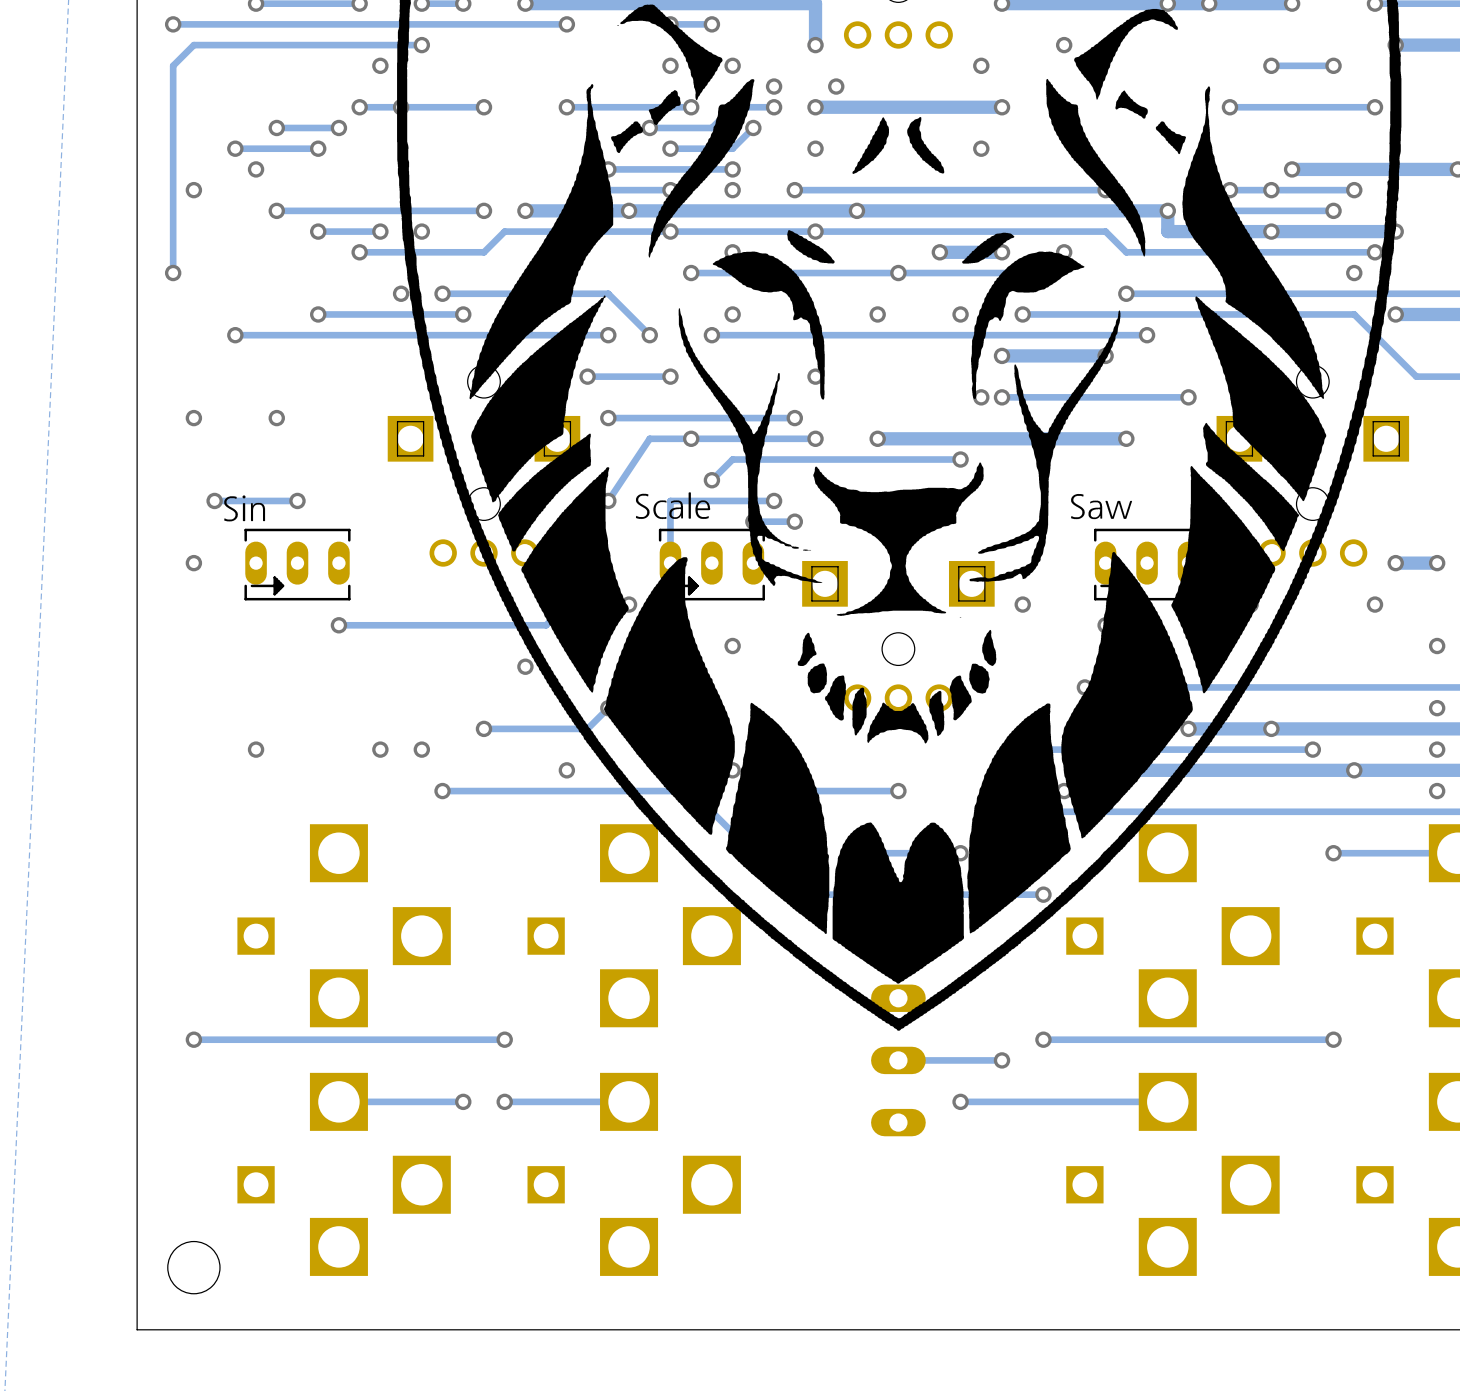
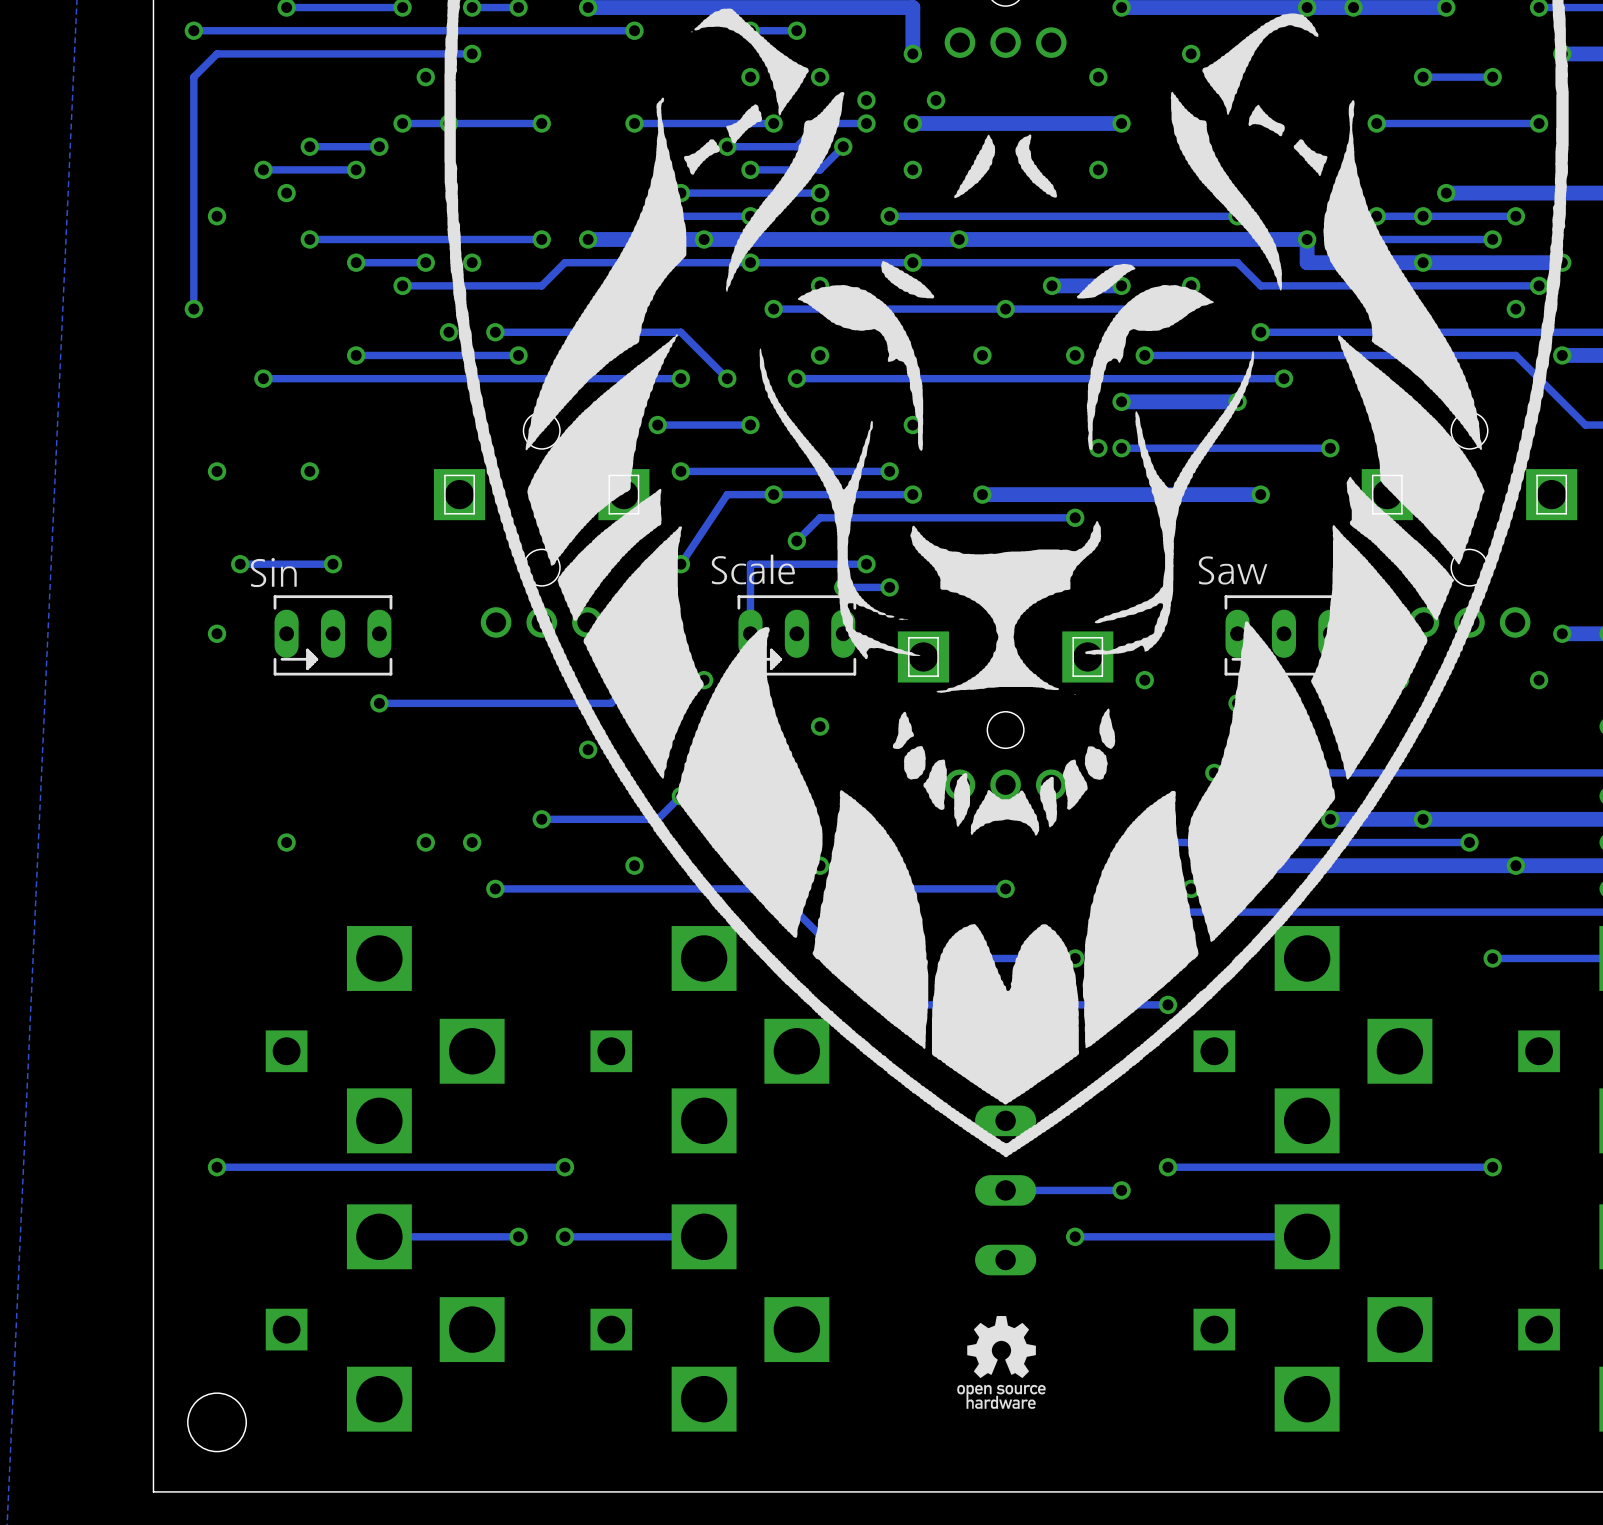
drawing: none -> [957, 1316, 1046, 1409]

